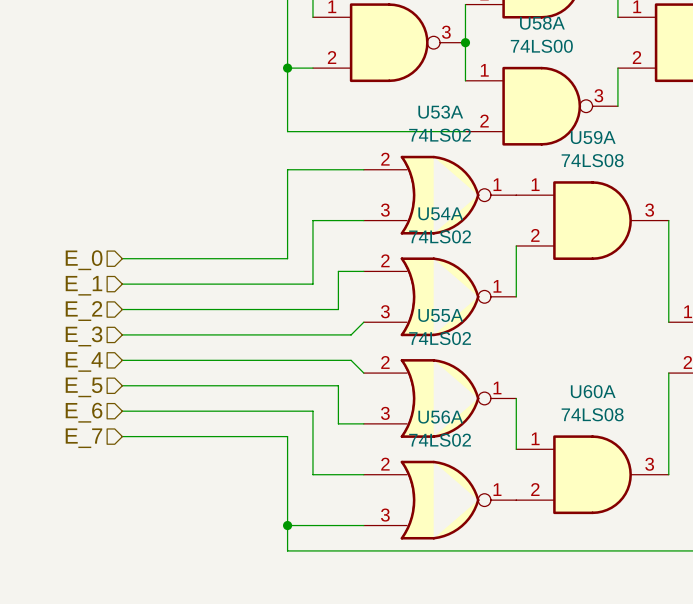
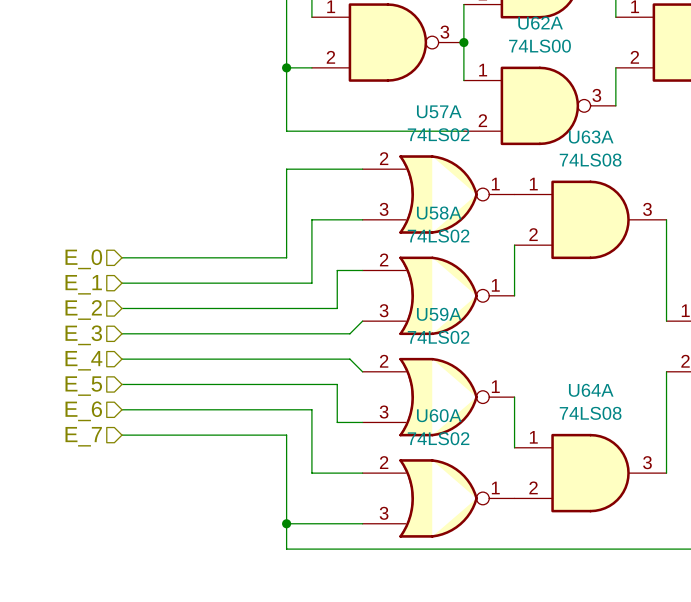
U58A name: U58A (542, 23) -> U62A (540, 23)
U53A name: U53A (440, 112) -> U57A (439, 111)
U59A name: U59A (593, 137) -> U63A (591, 137)
U54A name: U54A (440, 213) -> U58A (439, 213)
U55A name: U55A (440, 315) -> U59A (439, 314)
U60A name: U60A (593, 391) -> U64A (591, 390)
U56A name: U56A (440, 417) -> U60A (439, 415)

